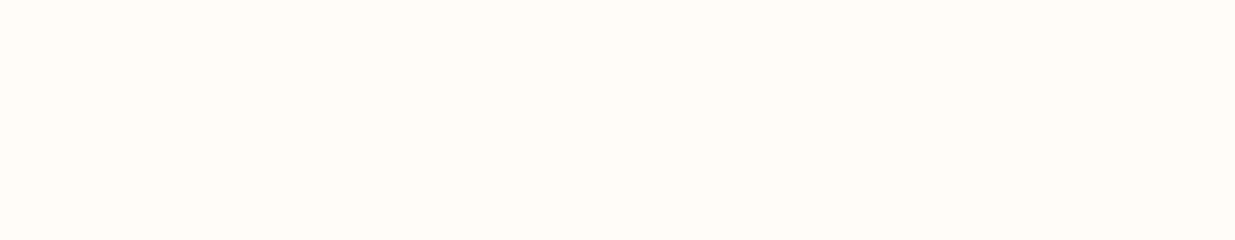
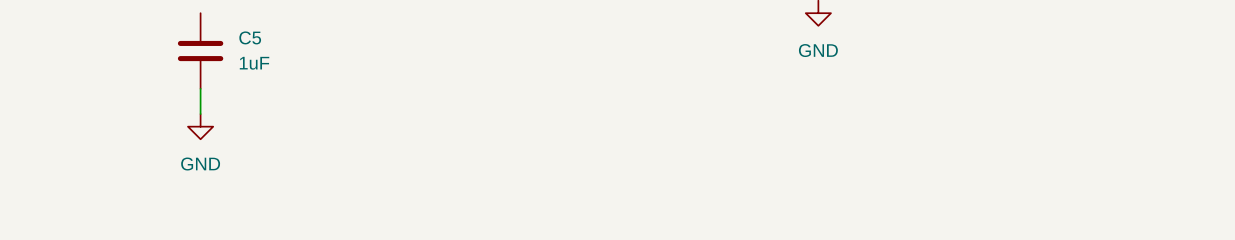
power symbol: none -> GND (818, 13)
C5: none -> 1uF (200, 51)
wire: none -> (200, 88) (200, 114)
power symbol: none -> GND (200, 126)

